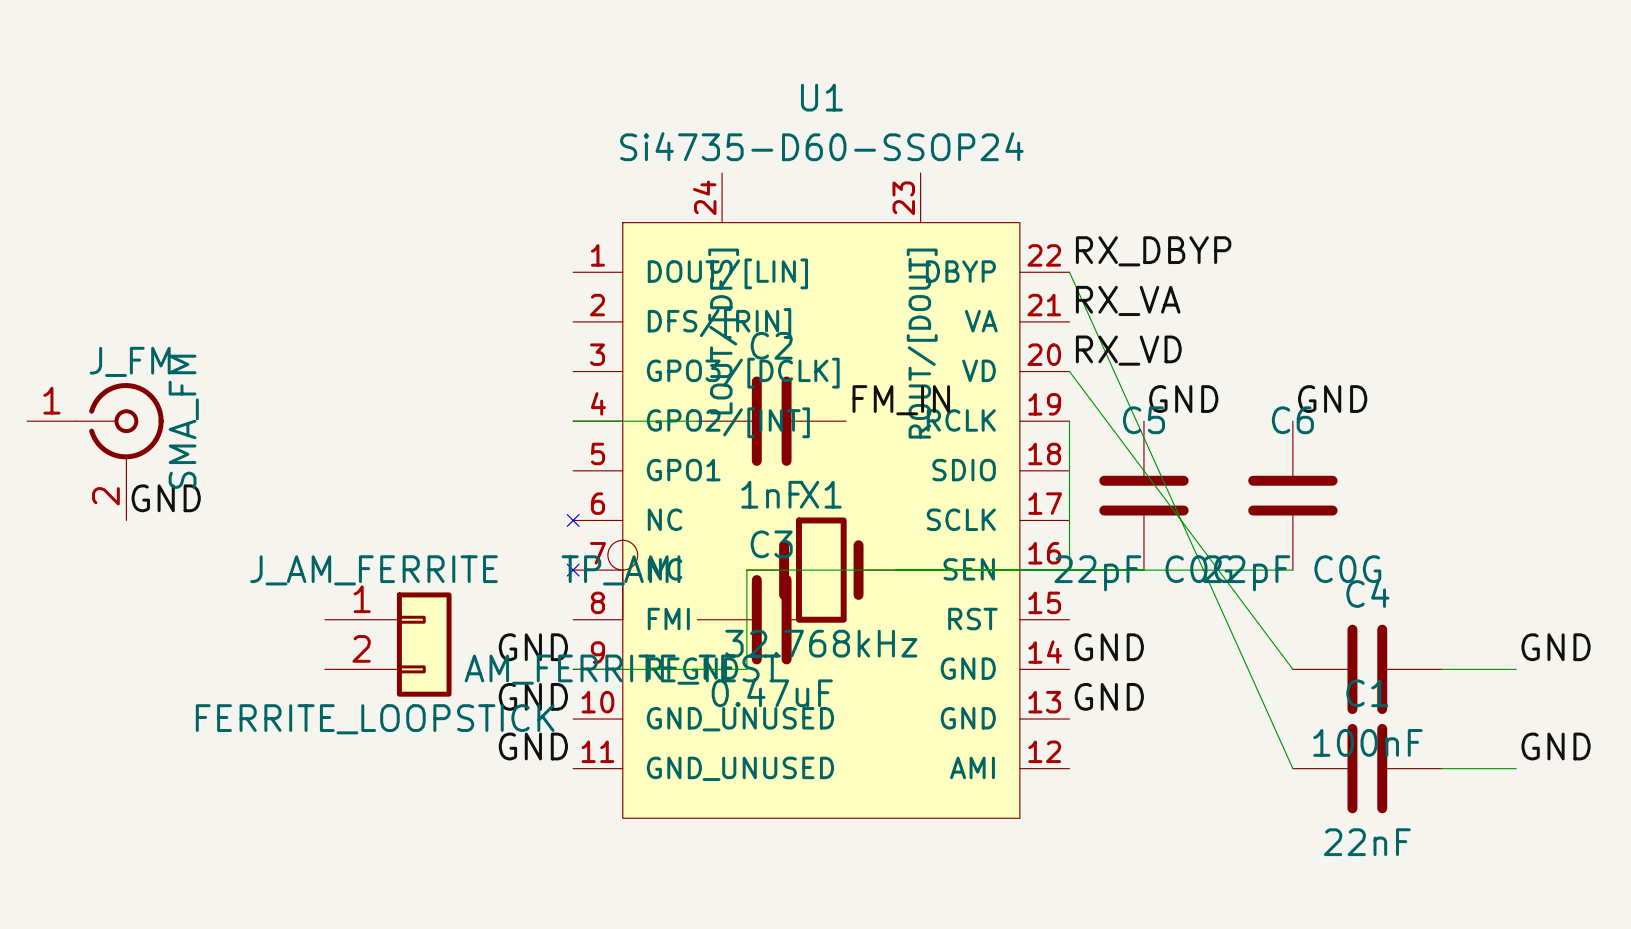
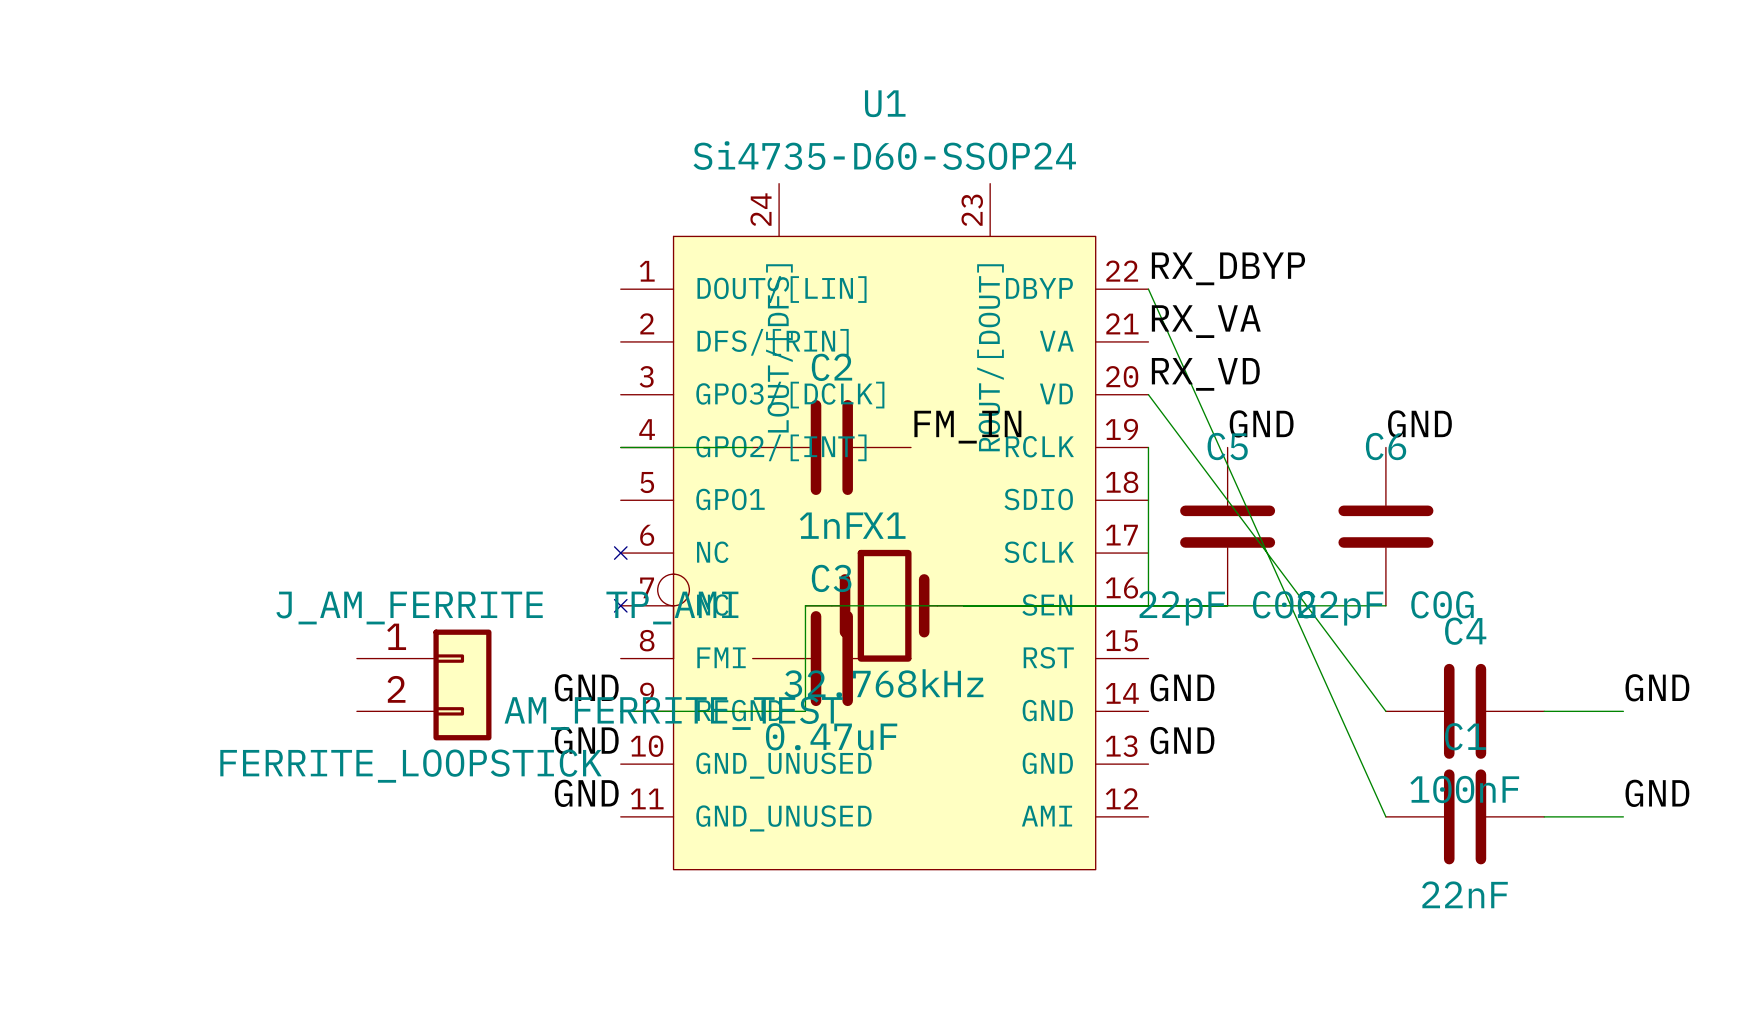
J_FM: SMA_FM (95, 451) -> none
label: GND (166, 498) -> none

